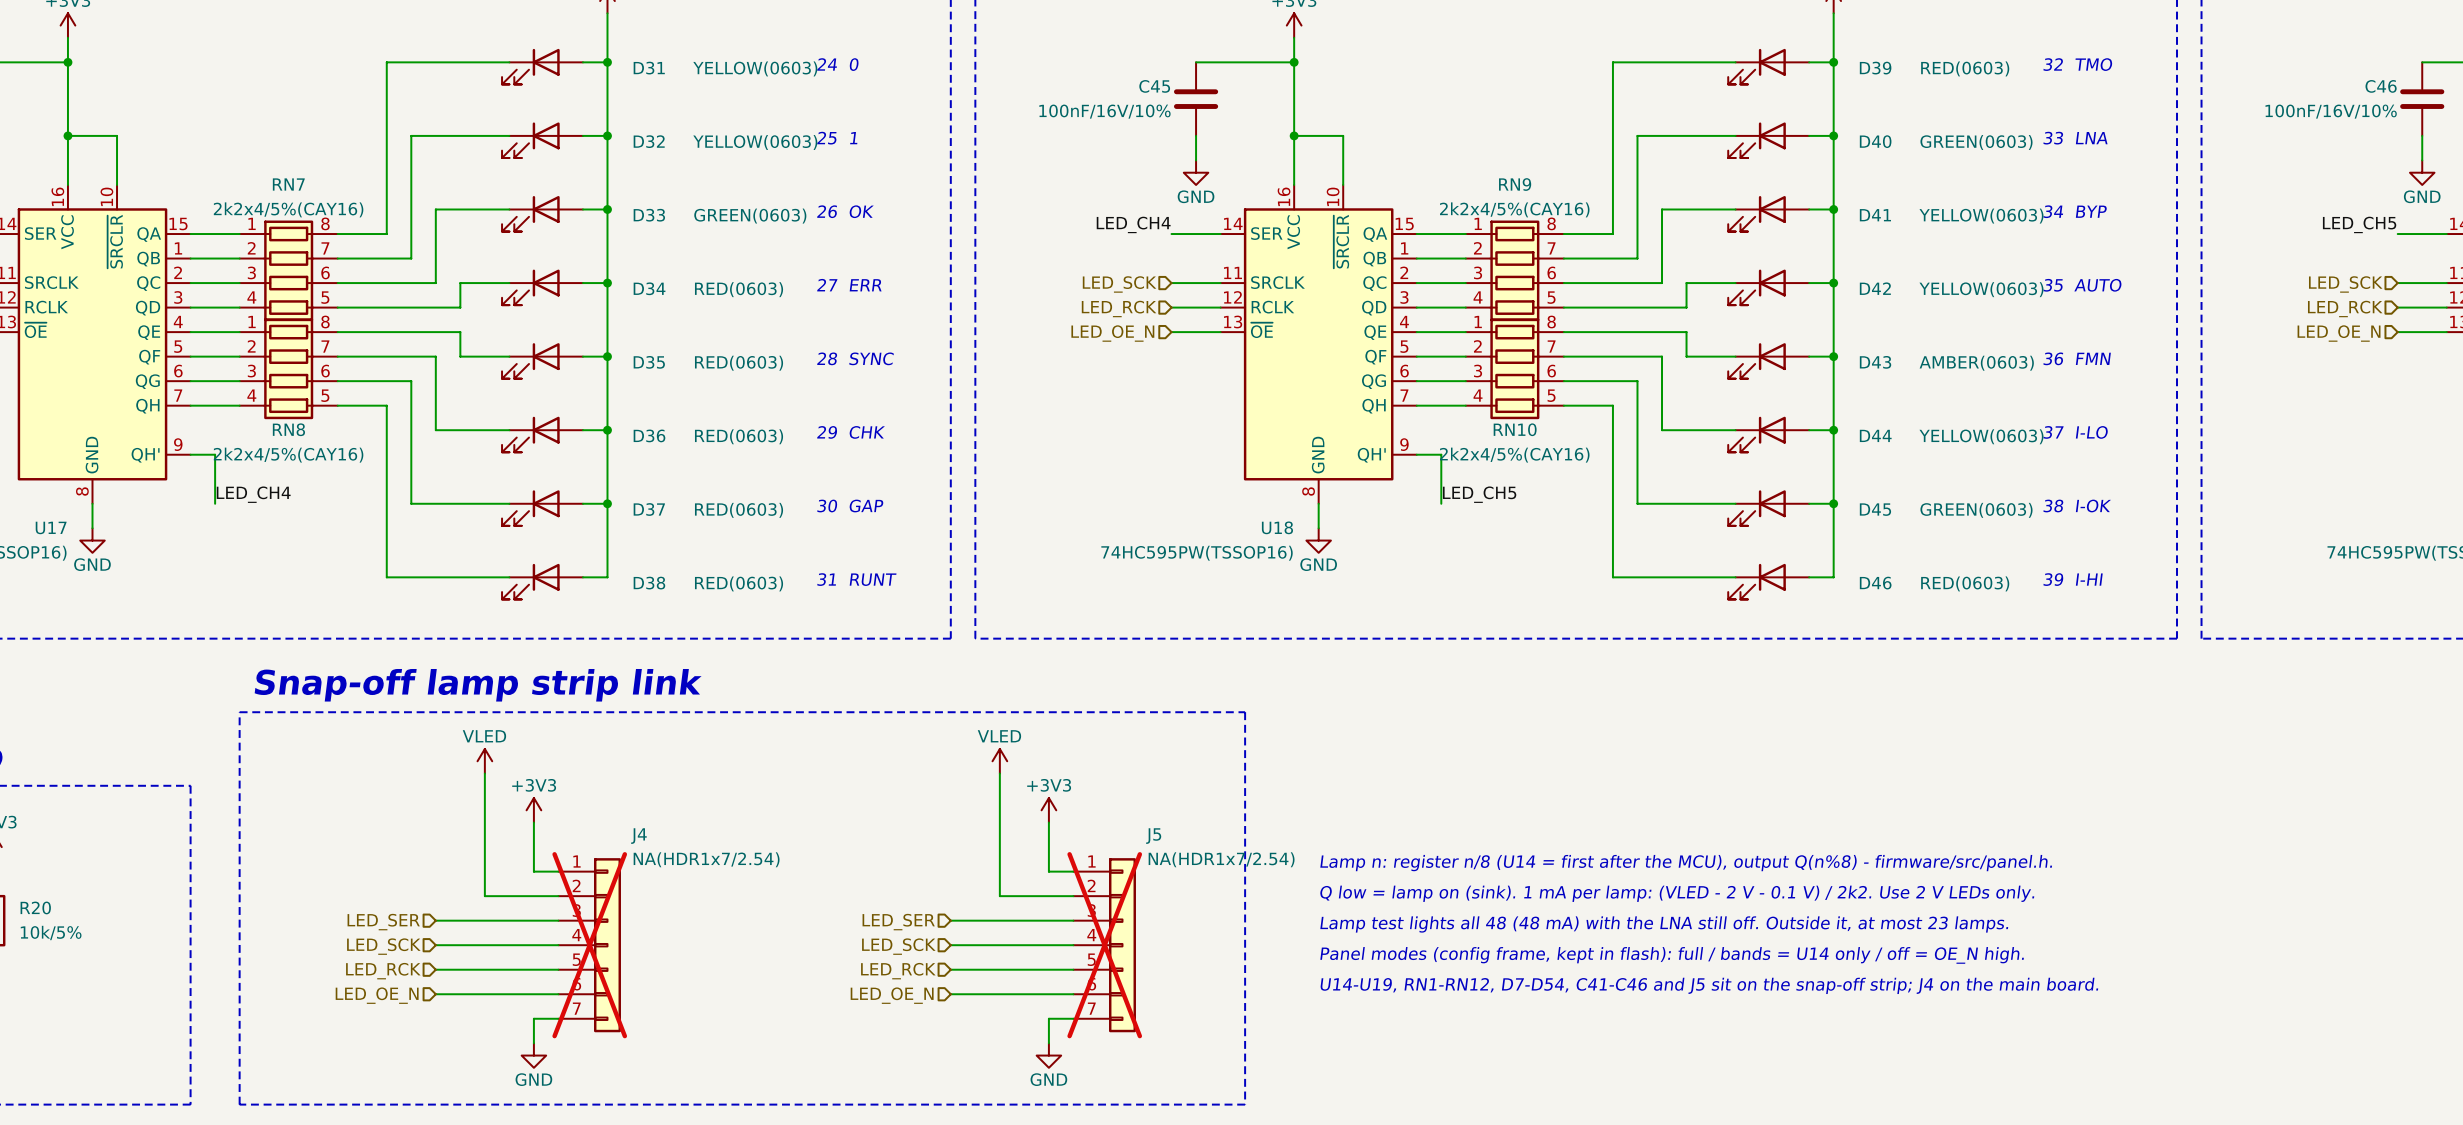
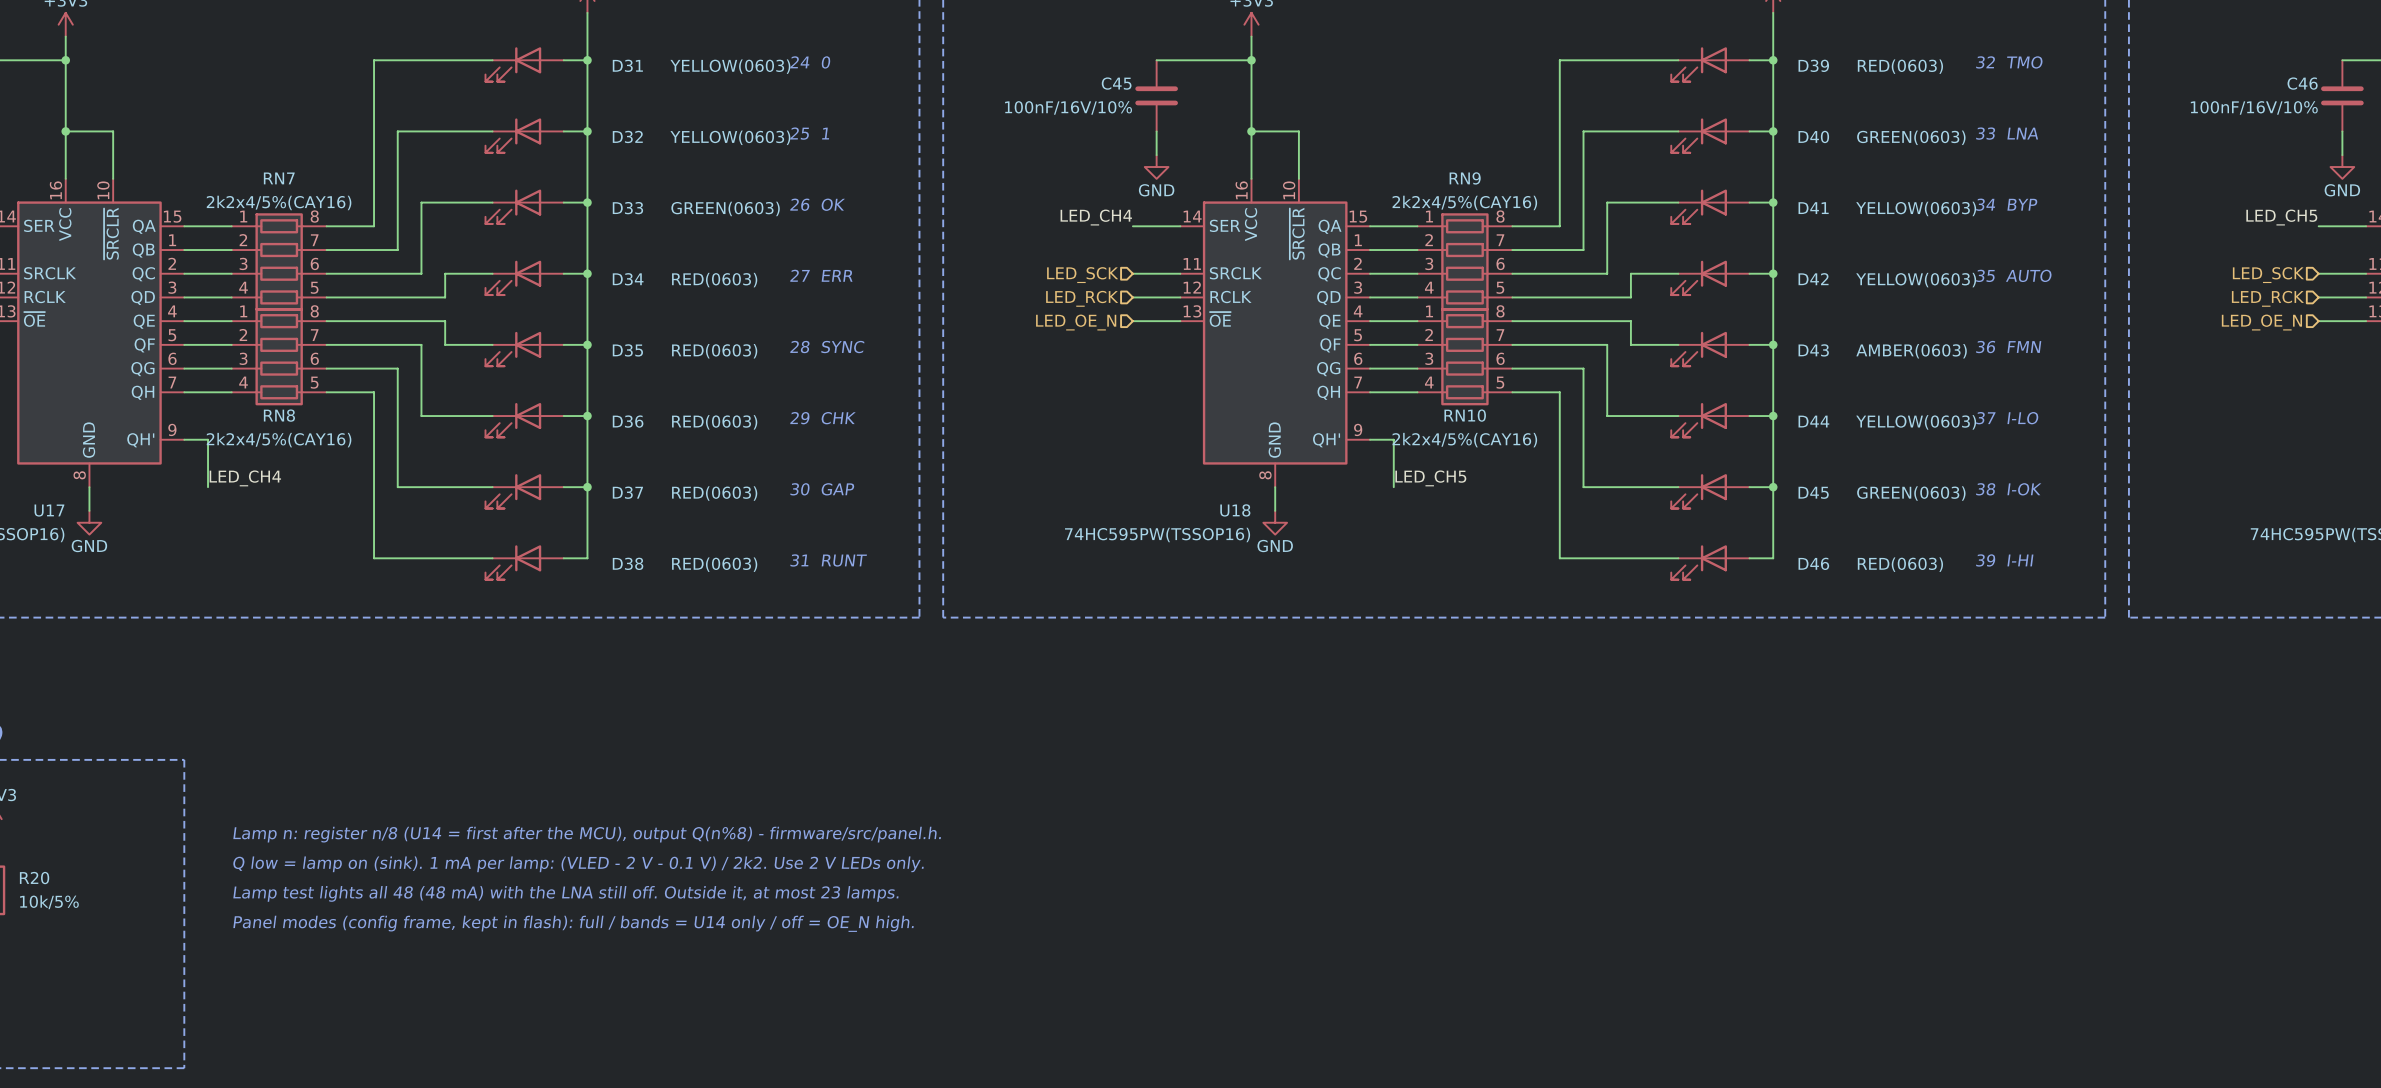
text: Snap-off lamp strip link (478, 685) -> none
line: (239, 712) (1245, 712) (1245, 1104) (239, 1104) (239, 712) -> none
power symbol: VLED (484, 761) -> none
power symbol: VLED (999, 761) -> none
wire: (484, 773) (484, 896) (558, 896) -> none
wire: (999, 773) (999, 896) (1073, 896) -> none
power symbol: +3V3 (533, 810) -> none
power symbol: +3V3 (1048, 810) -> none
wire: (533, 822) (533, 871) (558, 871) -> none
wire: (1048, 822) (1048, 871) (1073, 871) -> none
text: none -> Lamp n: register n/8 (U14 = first after the MCU), output Q(n%8) - firmware/src/panel.h. (587, 834)
text: Lamp n: register n/8 (U14 = first after the MCU), output Q(n%8) - firmware/src/panel.h. (1686, 863) -> none
text: none -> Q low = lamp on (sink). 1 mA per lamp: (VLED - 2 V - 0.1 V) / 2k2. Use 2 V LEDs only. (578, 864)
text: Q low = lamp on (sink). 1 mA per lamp: (VLED - 2 V - 0.1 V) / 2k2. Use 2 V LEDs only. (1677, 893) -> none
wire: (435, 920) (558, 920) -> none
wire: (950, 920) (1073, 920) -> none
hierarchical label: LED_SER (383, 922) -> none
hierarchical label: LED_SER (898, 922) -> none
text: none -> Lamp test lights all 48 (48 mA) with the LNA still off. Outside it, at most 23 lamps. (565, 893)
text: Lamp test lights all 48 (48 mA) with the LNA still off. Outside it, at most 23 lamps. (1664, 924) -> none
wire: (435, 945) (558, 945) -> none
J4: NA(HDR1x7/2.54) (589, 945) -> none
wire: (950, 945) (1073, 945) -> none
J5: NA(HDR1x7/2.54) (1104, 945) -> none
hierarchical label: LED_SCK (383, 946) -> none
hierarchical label: LED_SCK (898, 946) -> none
text: none -> Panel modes (config frame, kept in flash): full / bands = U14 only / off = OE_N high. (573, 923)
text: Panel modes (config frame, kept in flash): full / bands = U14 only / off = OE_N high. (1672, 955) -> none
wire: (435, 969) (558, 969) -> none
wire: (950, 969) (1073, 969) -> none
hierarchical label: LED_RCK (383, 971) -> none
hierarchical label: LED_RCK (898, 971) -> none
text: U14-U19, RN1-RN12, D7-D54, C41-C46 and J5 sit on the snap-off strip; J4 on the main board. (1709, 985) -> none
wire: (435, 994) (558, 994) -> none
wire: (950, 994) (1073, 994) -> none
hierarchical label: LED_OE_N (377, 995) -> none
hierarchical label: LED_OE_N (892, 995) -> none
wire: (558, 1018) (533, 1018) (533, 1043) -> none
wire: (1073, 1018) (1048, 1018) (1048, 1043) -> none
power symbol: GND (533, 1055) -> none
power symbol: GND (1048, 1055) -> none

